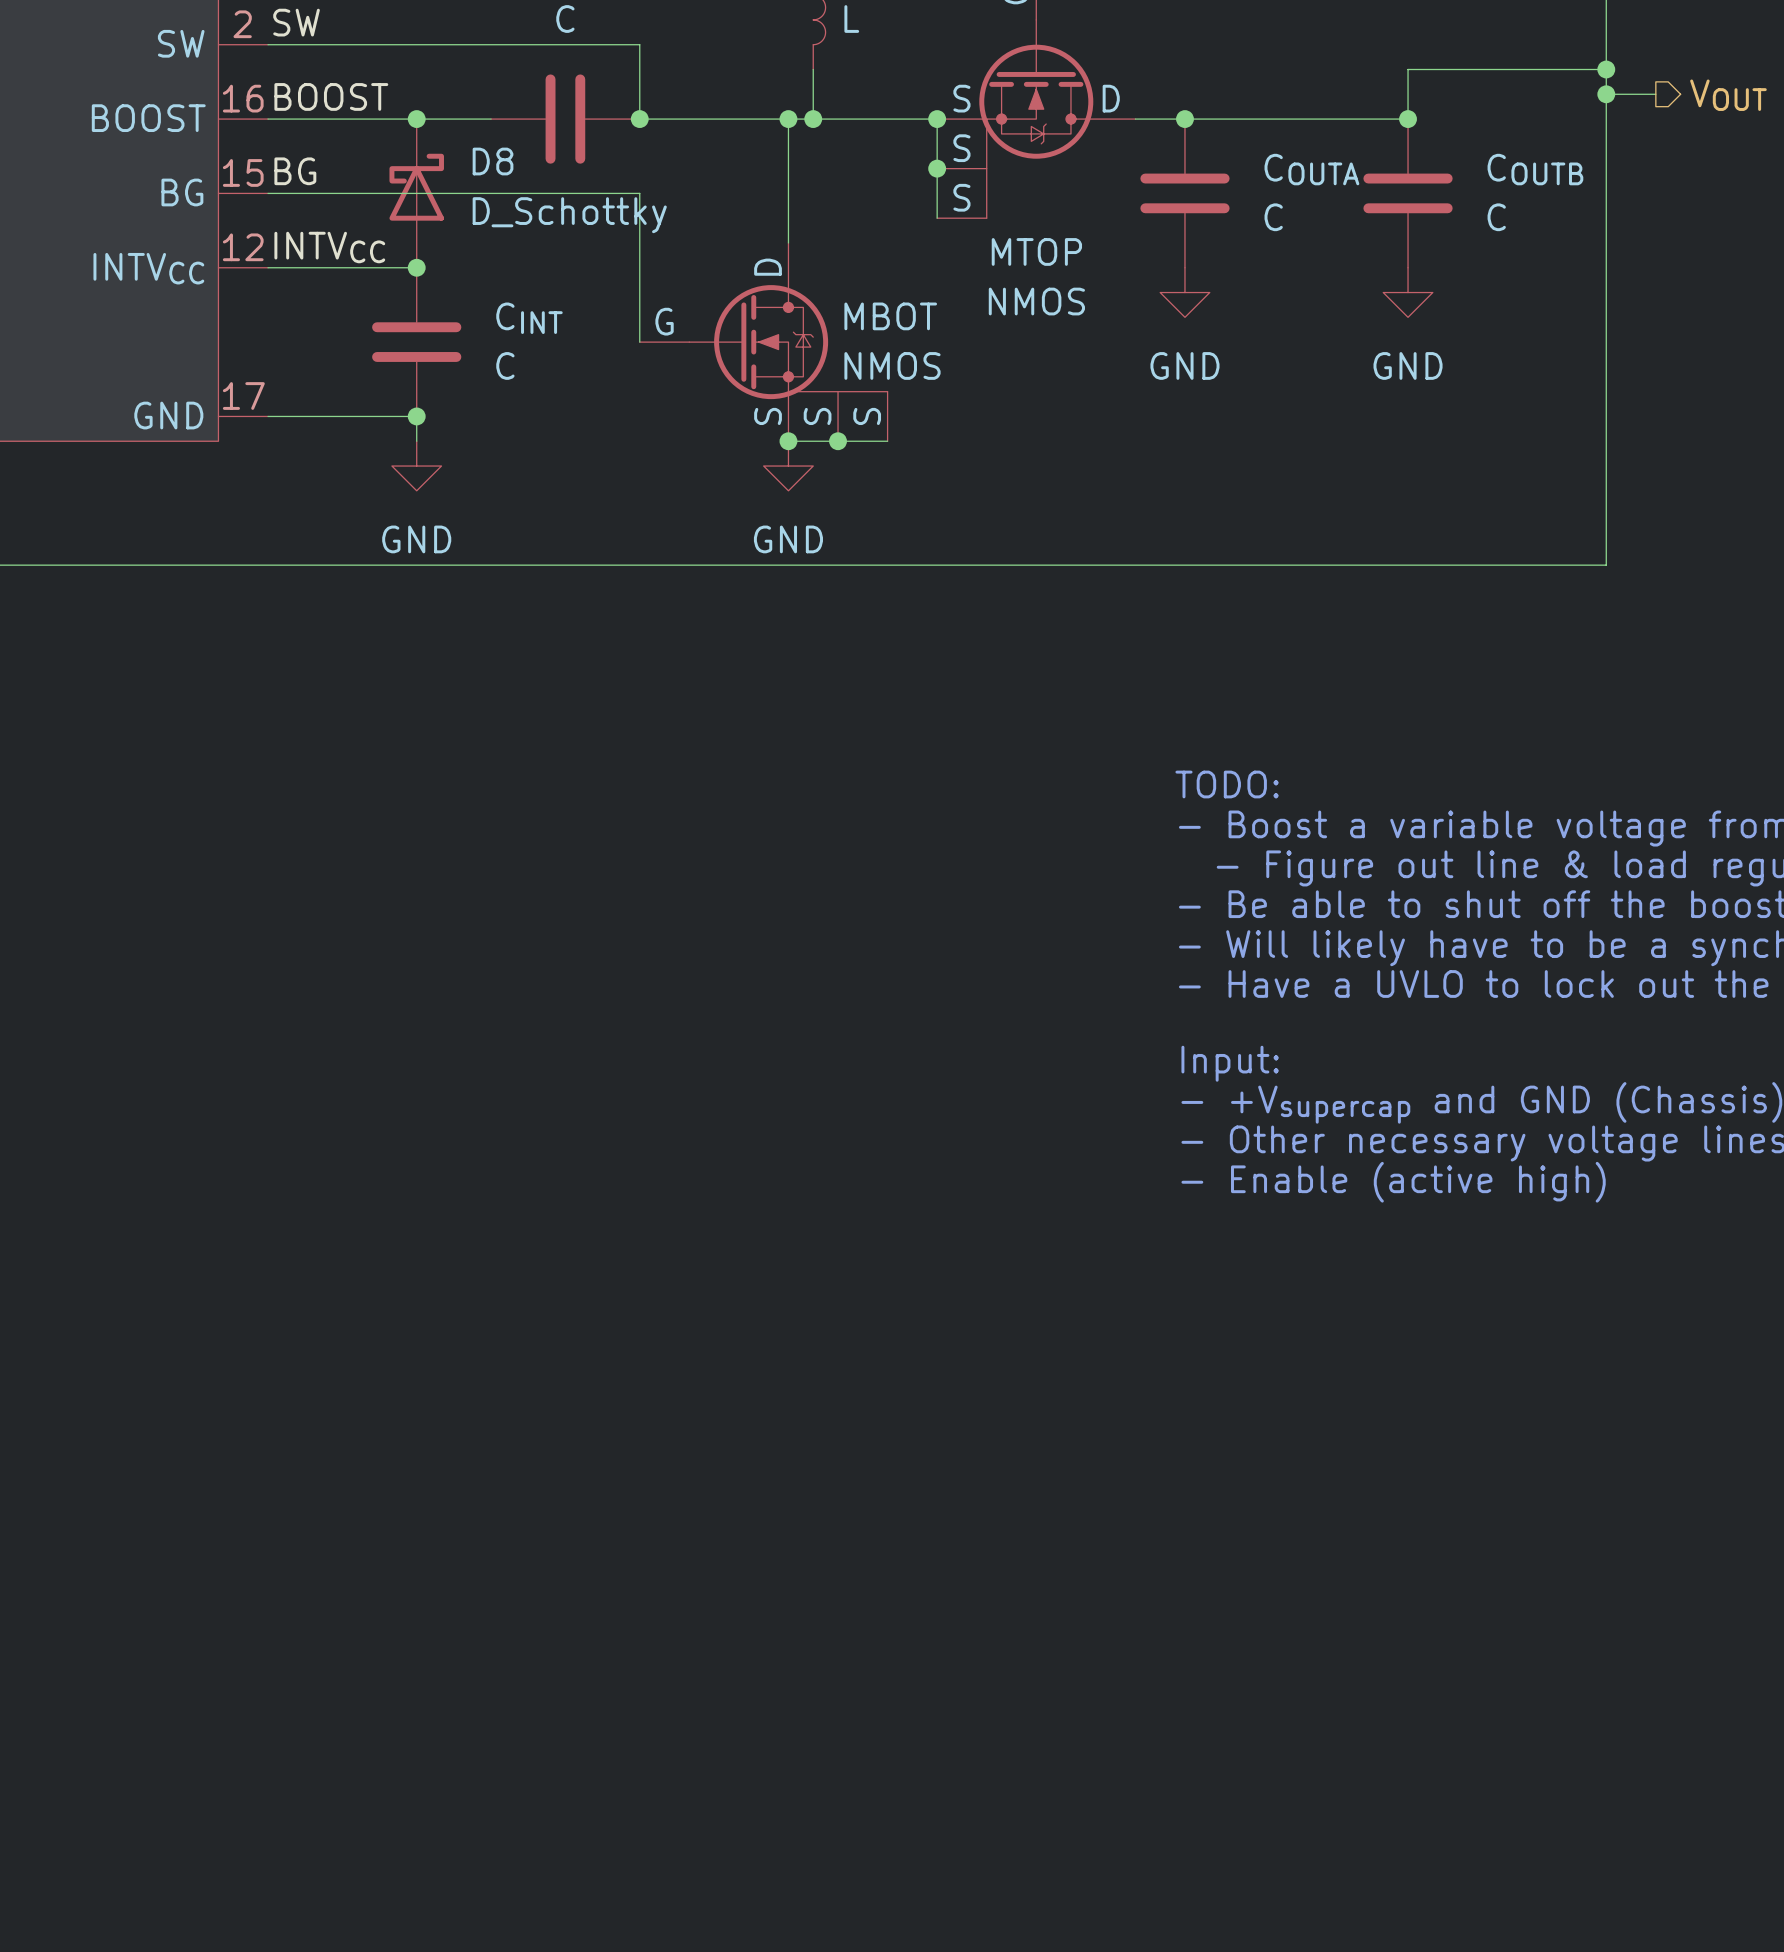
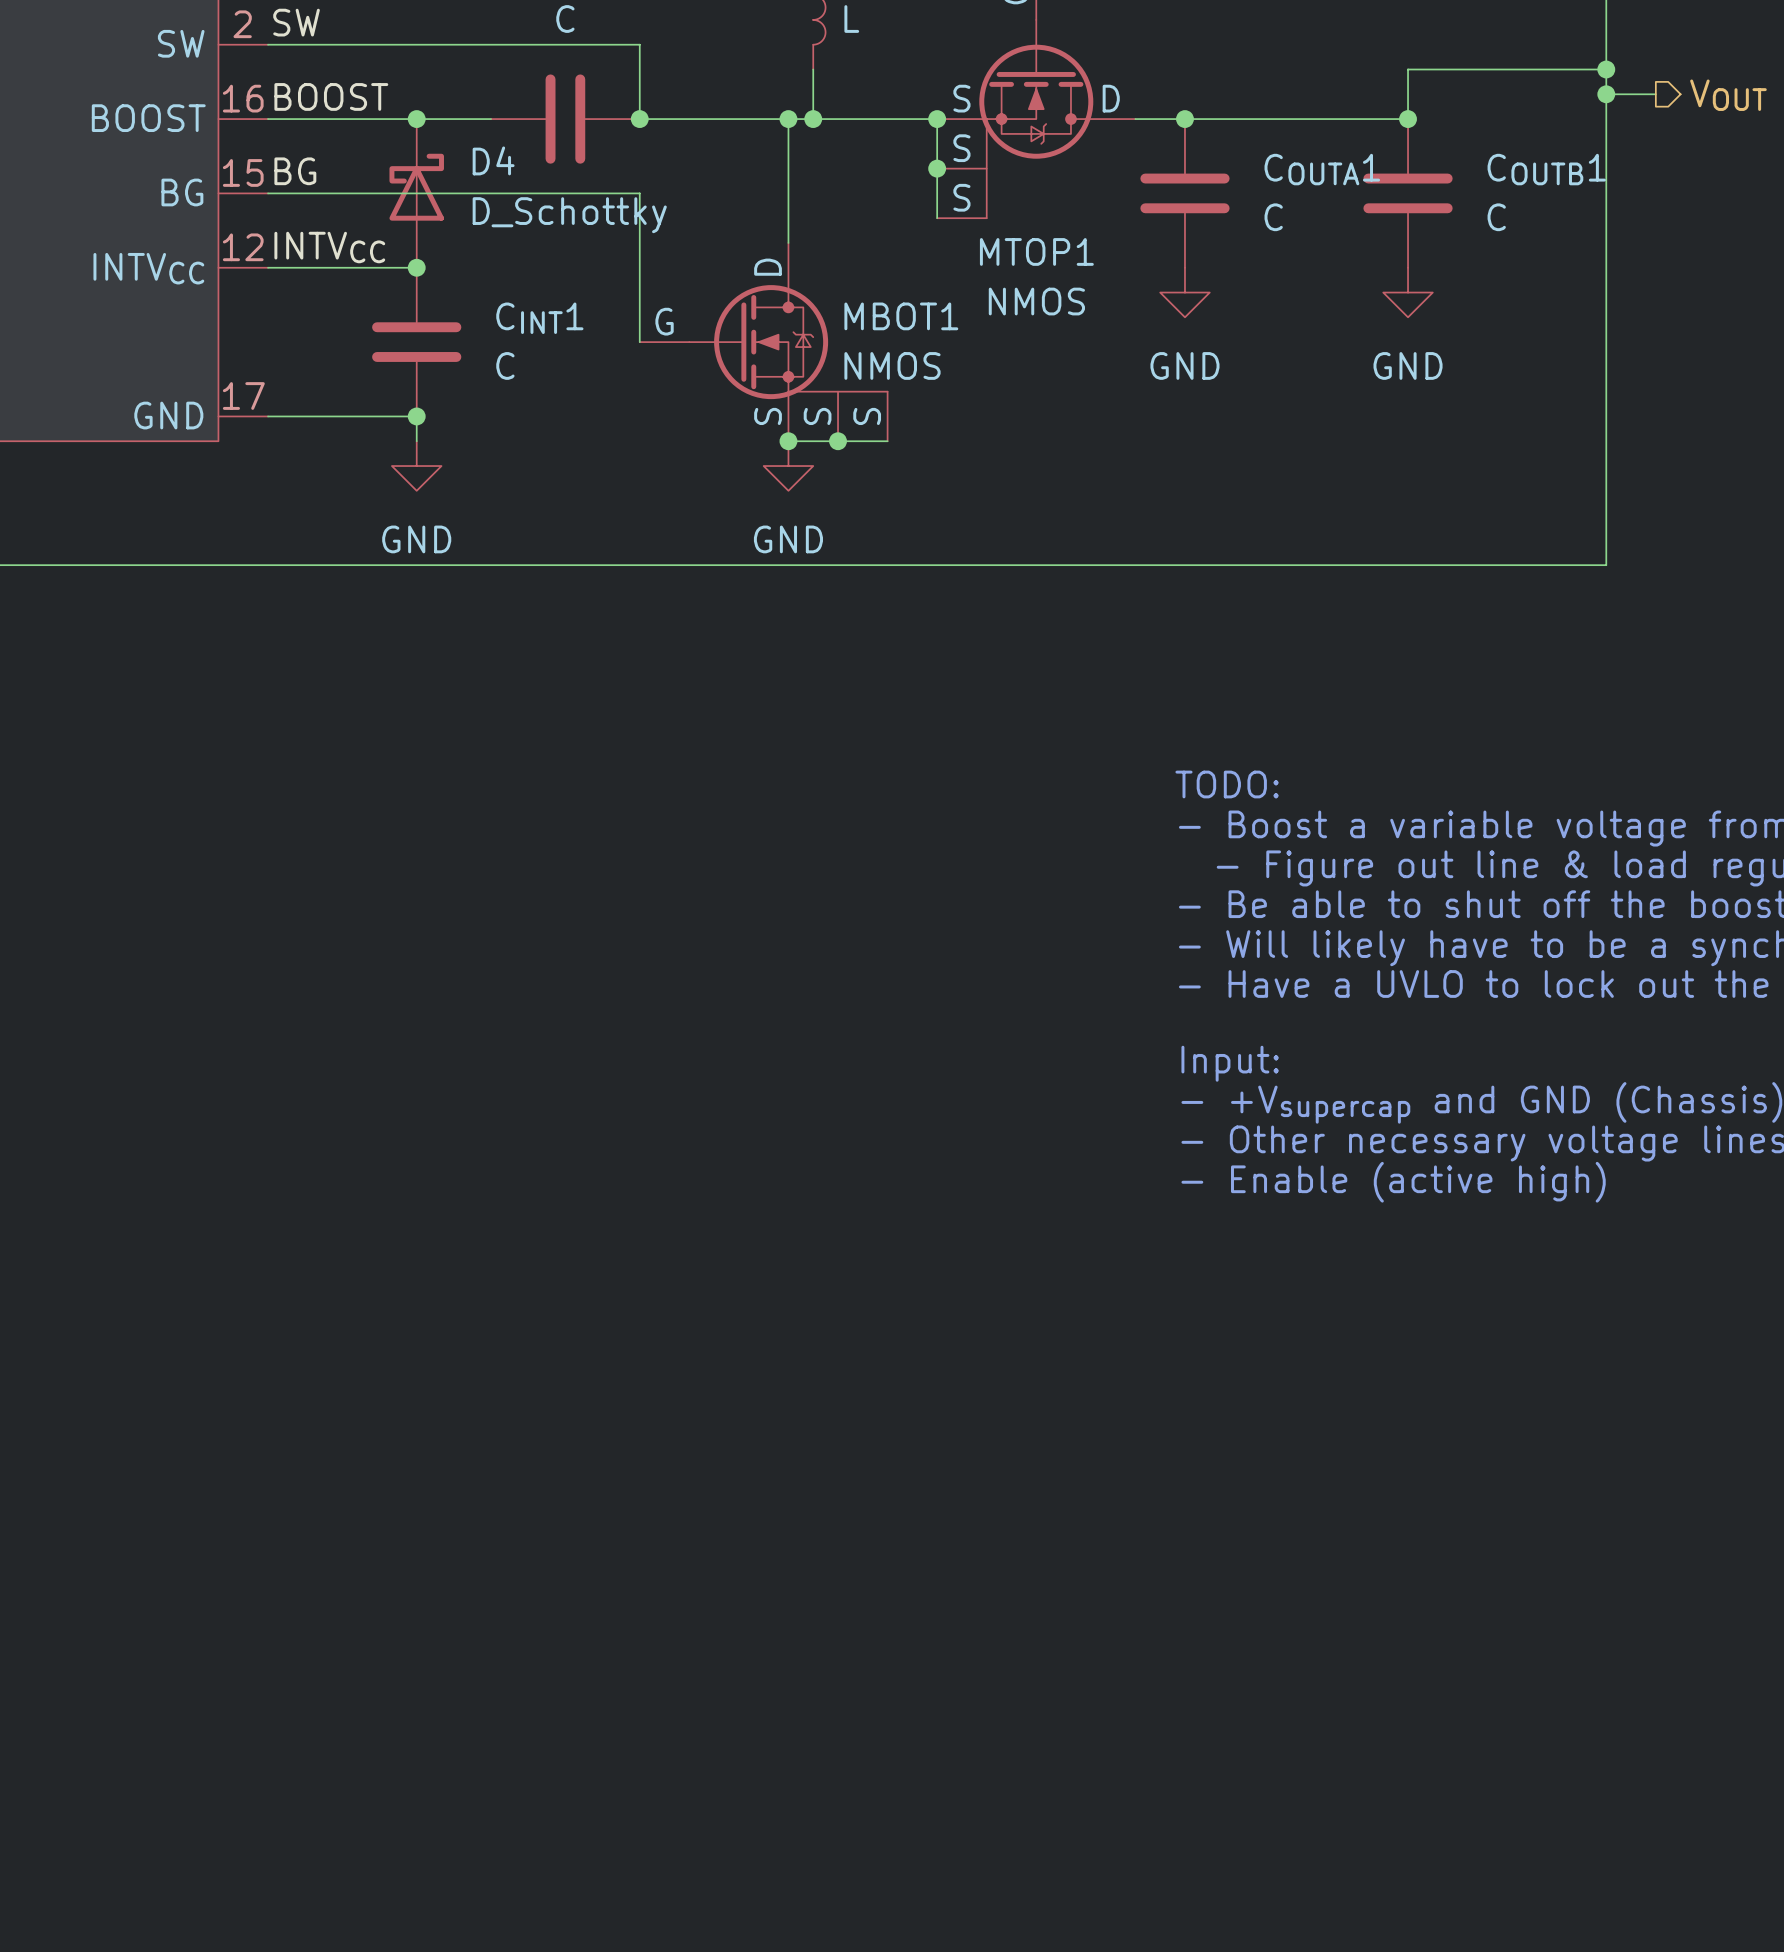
D8 name: D8 (493, 161) -> D4 (493, 160)
COUTA name: COUTA (1311, 169) -> COUTA1 (1322, 169)
COUTB name: COUTB (1535, 169) -> COUTB1 (1546, 169)
MTOP name: MTOP (1036, 251) -> MTOP1 (1036, 251)
MBOT name: MBOT (890, 316) -> MBOT1 (901, 316)
CINT name: CINT (529, 318) -> CINT1 (539, 318)

